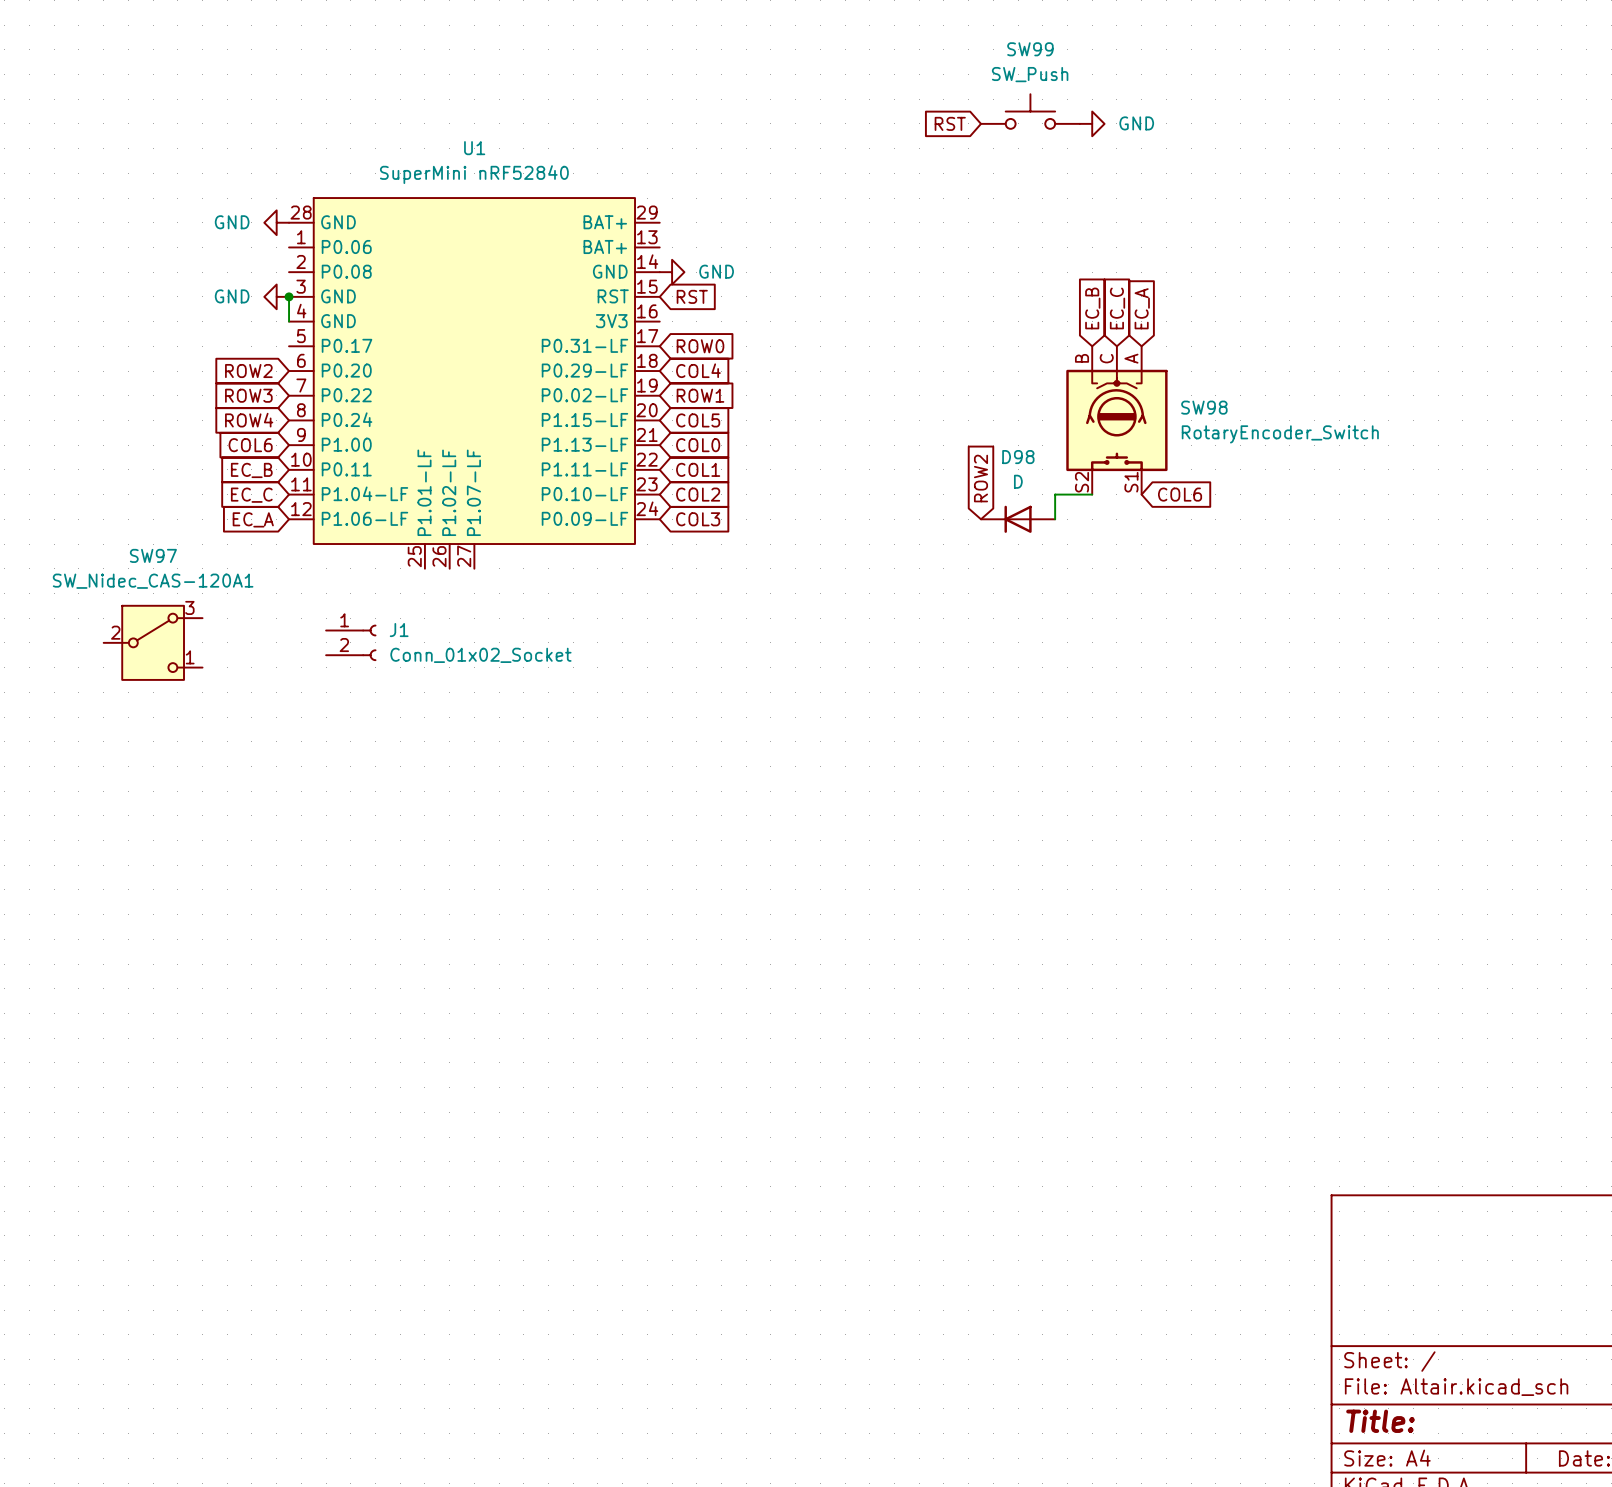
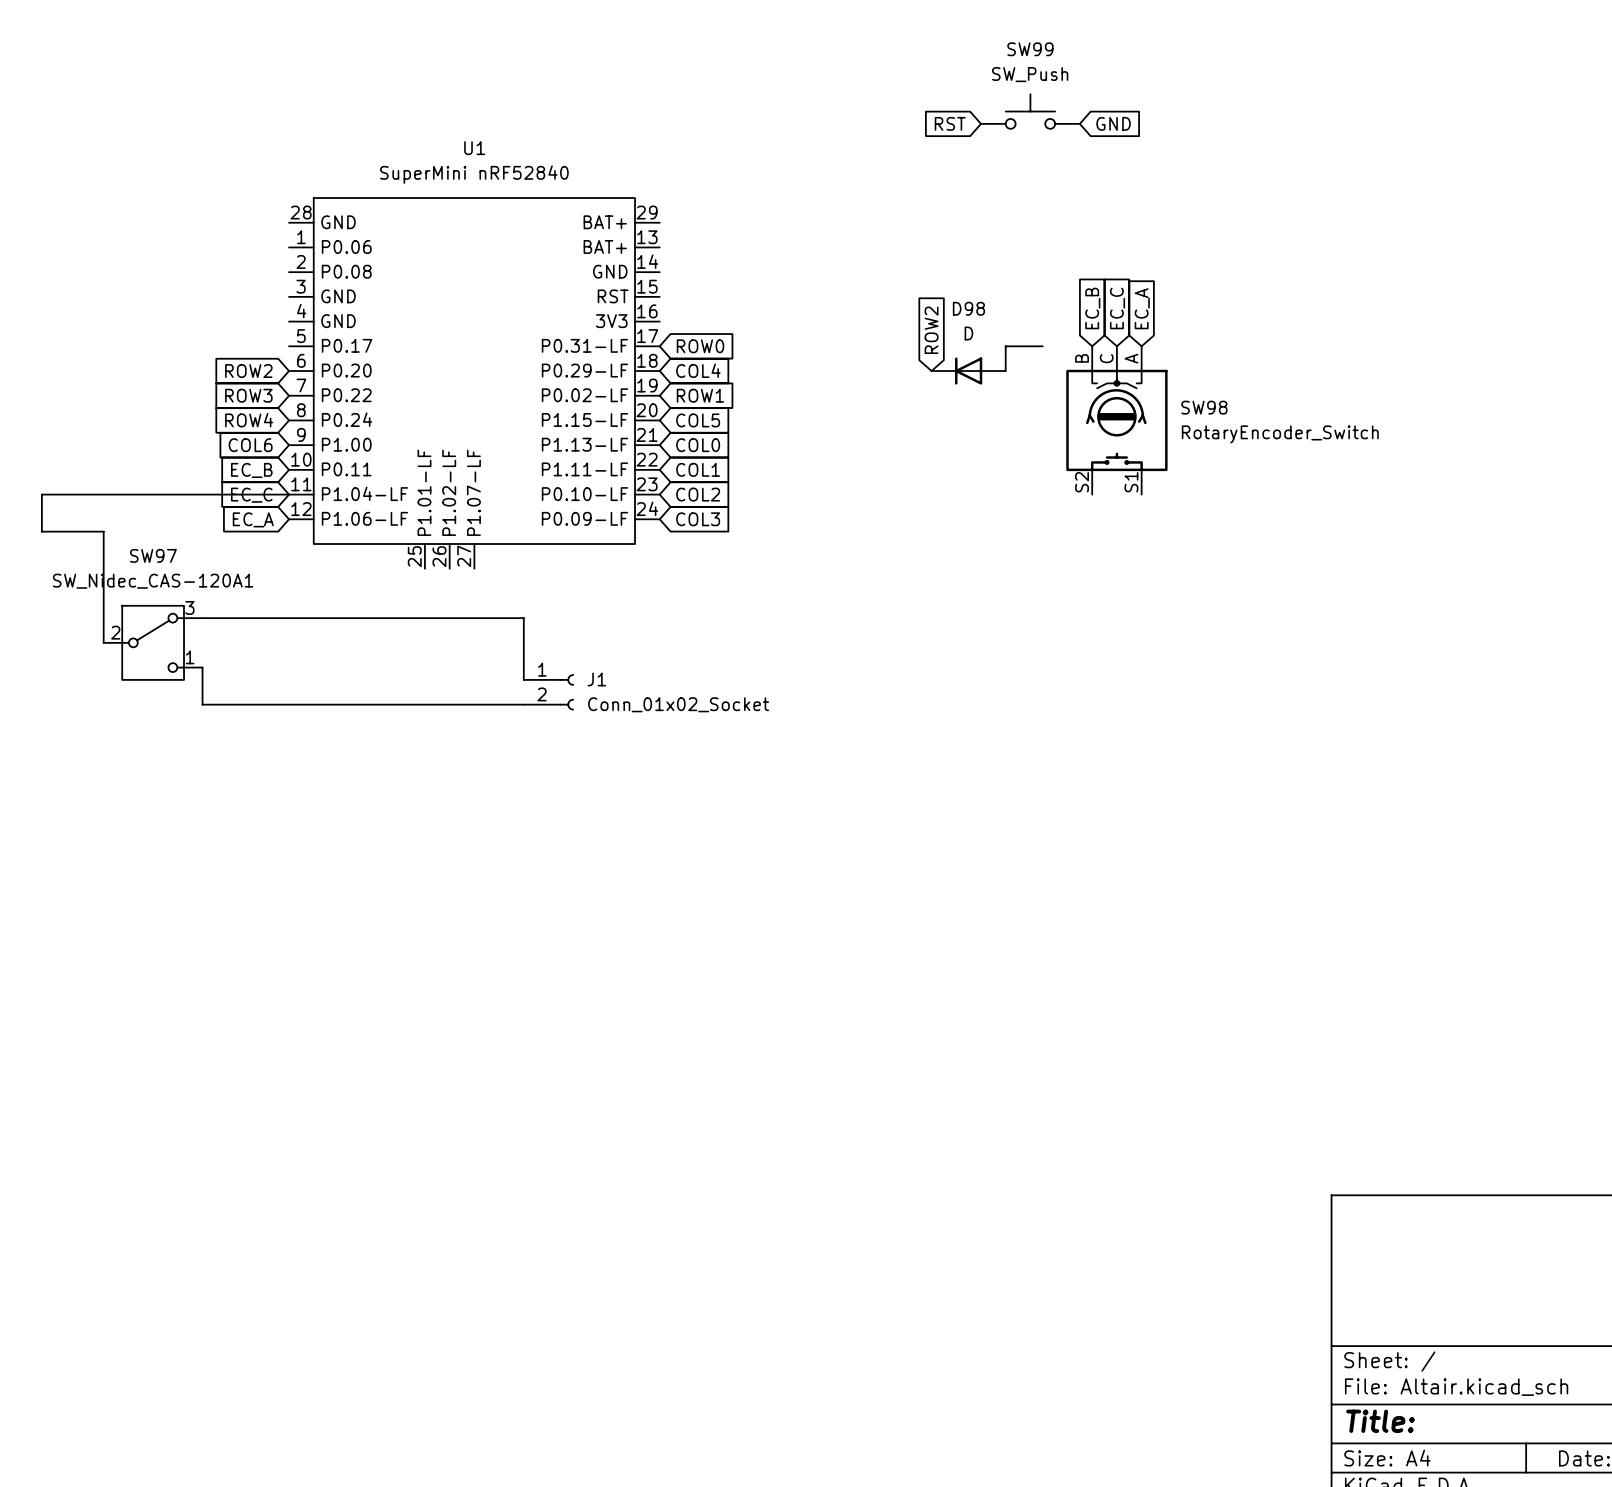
power symbol: GND (1092, 123) -> none
global label: none -> GND (1113, 123)
power symbol: GND (276, 222) -> none
power symbol: GND (672, 272) -> none
power symbol: GND (276, 296) -> none
wire: (289, 296) (289, 321) -> none
junction: (289, 296) -> none
global label: RST (692, 296) -> none
global label position: ROW2 (981, 478) -> ROW2 (931, 330)
wire: none -> (289, 494) (41, 494) (41, 531) (103, 531) (103, 642)
wire: (1092, 494) (1055, 494) (1055, 519) -> (1042, 346) (1005, 346) (1005, 371)
global label: COL6 (1180, 494) -> none
D98 position: (1018, 519) -> (968, 371)
wire: none -> (202, 618) (523, 618) (523, 679)
J1 position: (351, 642) -> (548, 692)
wire: none -> (202, 667) (202, 704) (523, 704)

